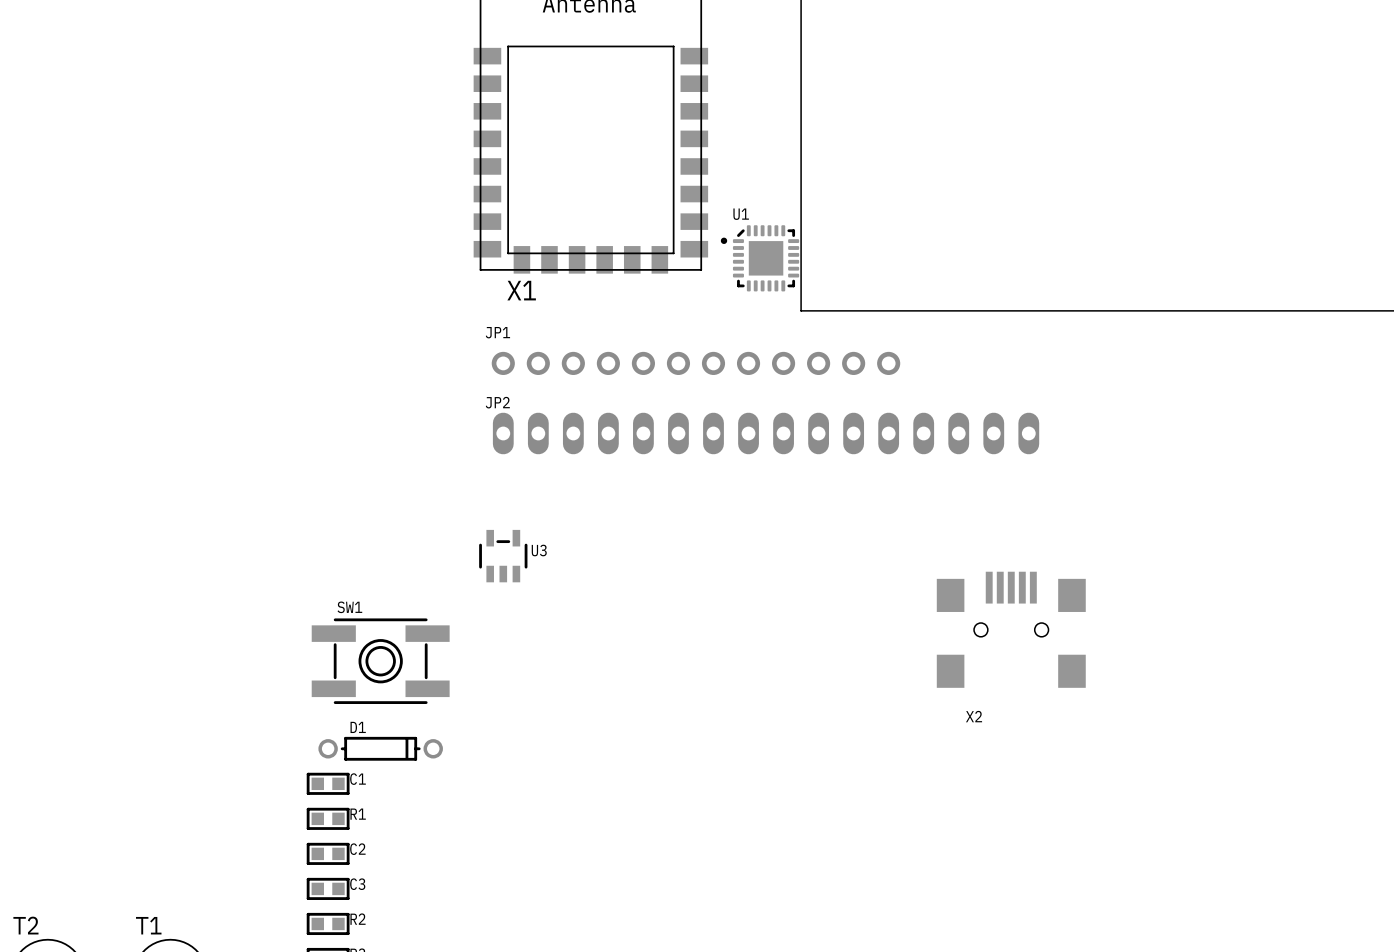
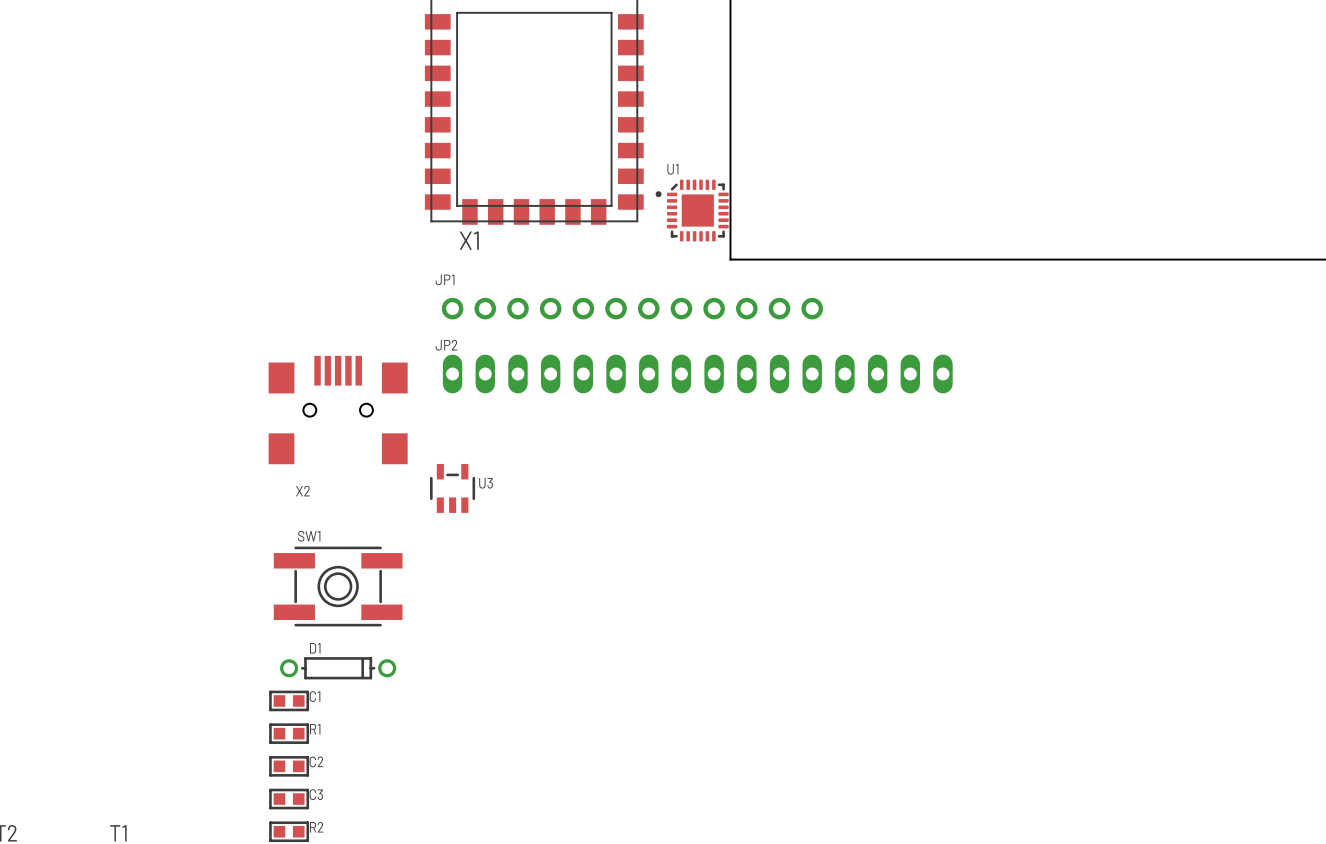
X2 position: (1011, 629) -> (338, 410)

